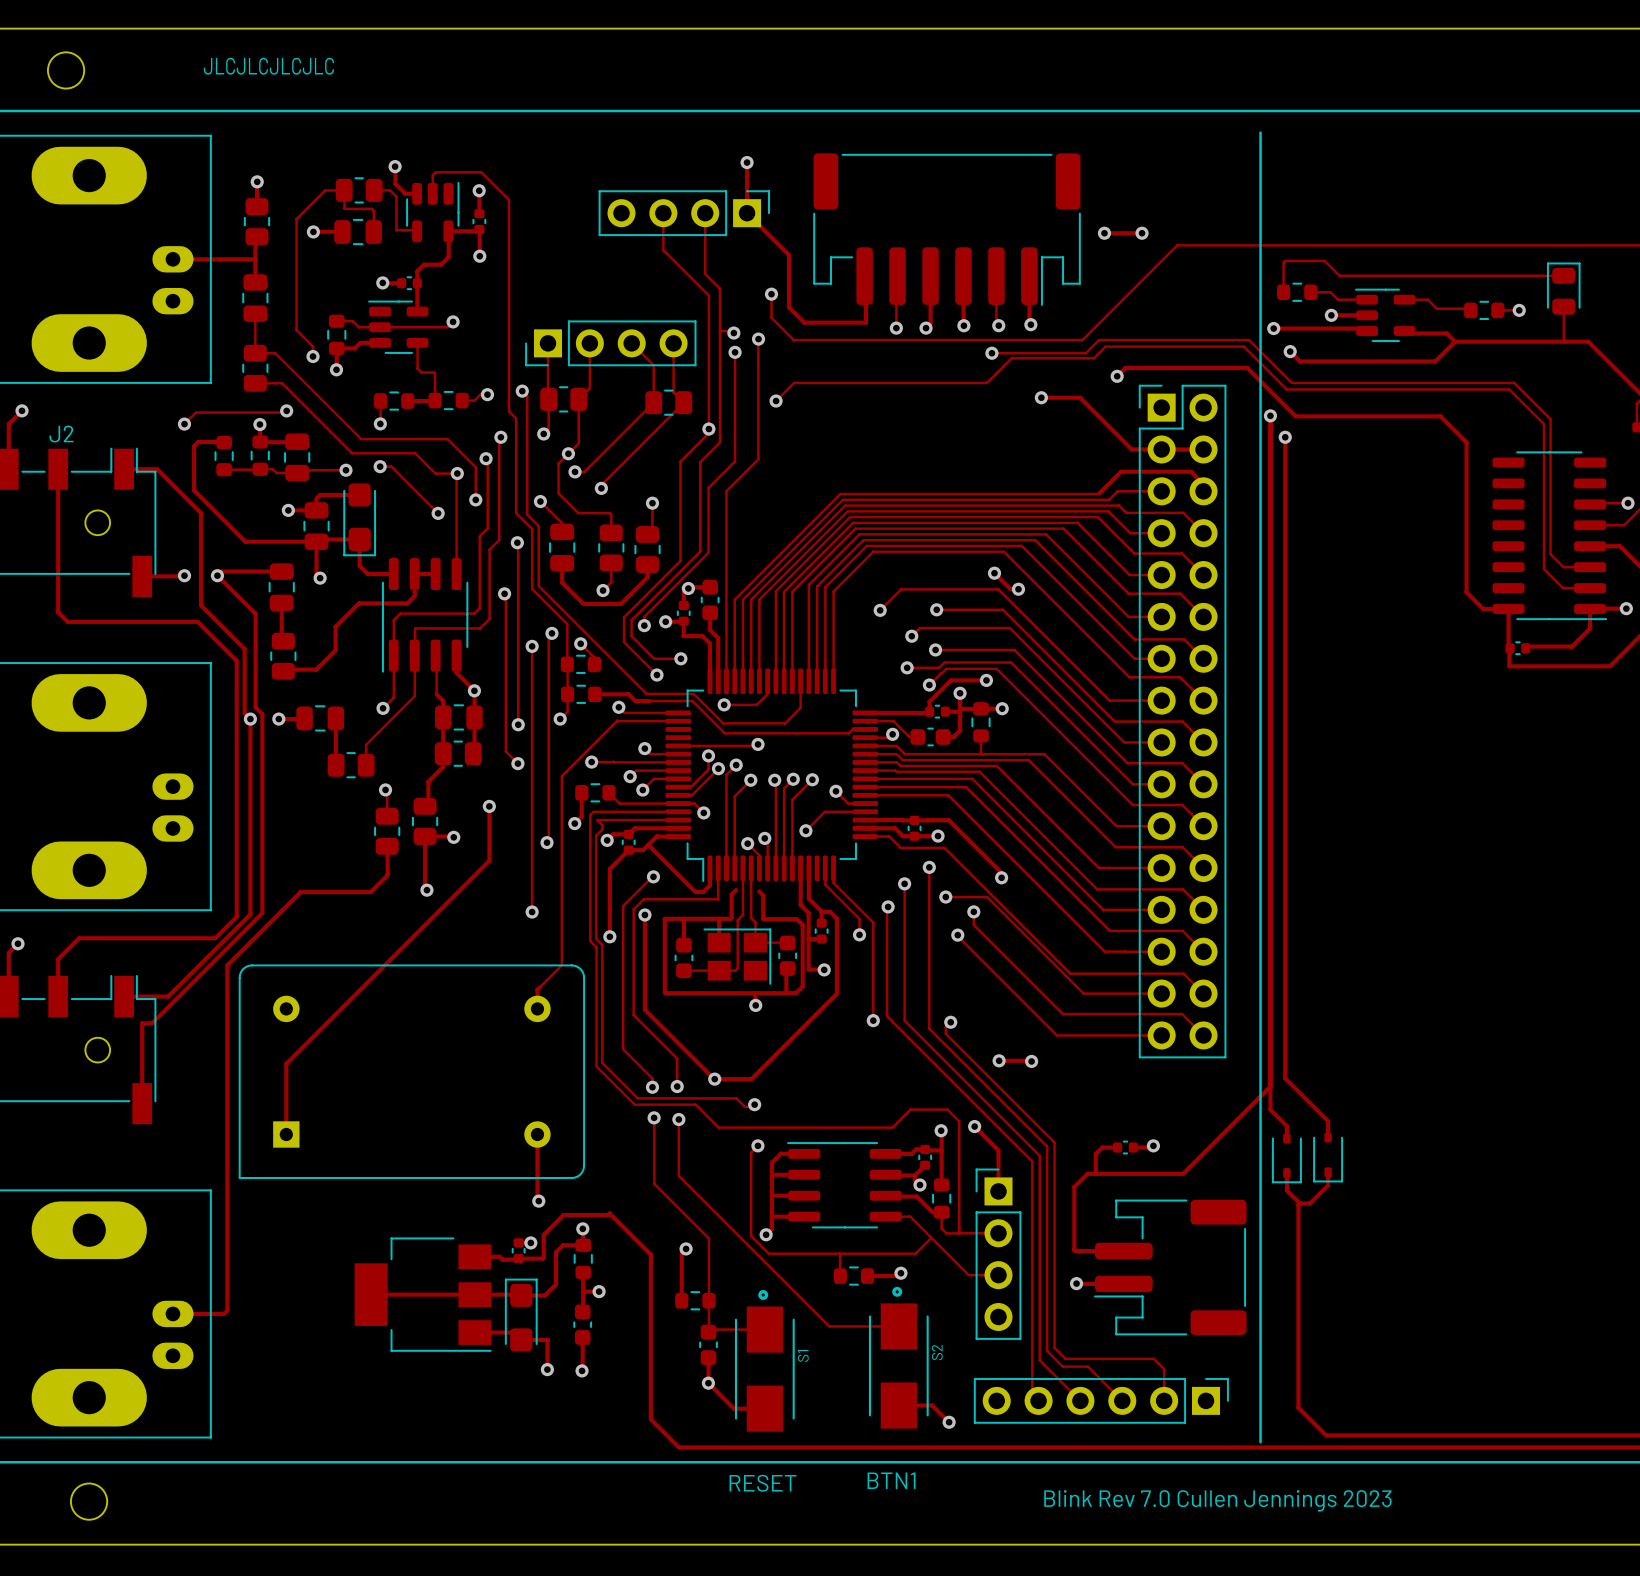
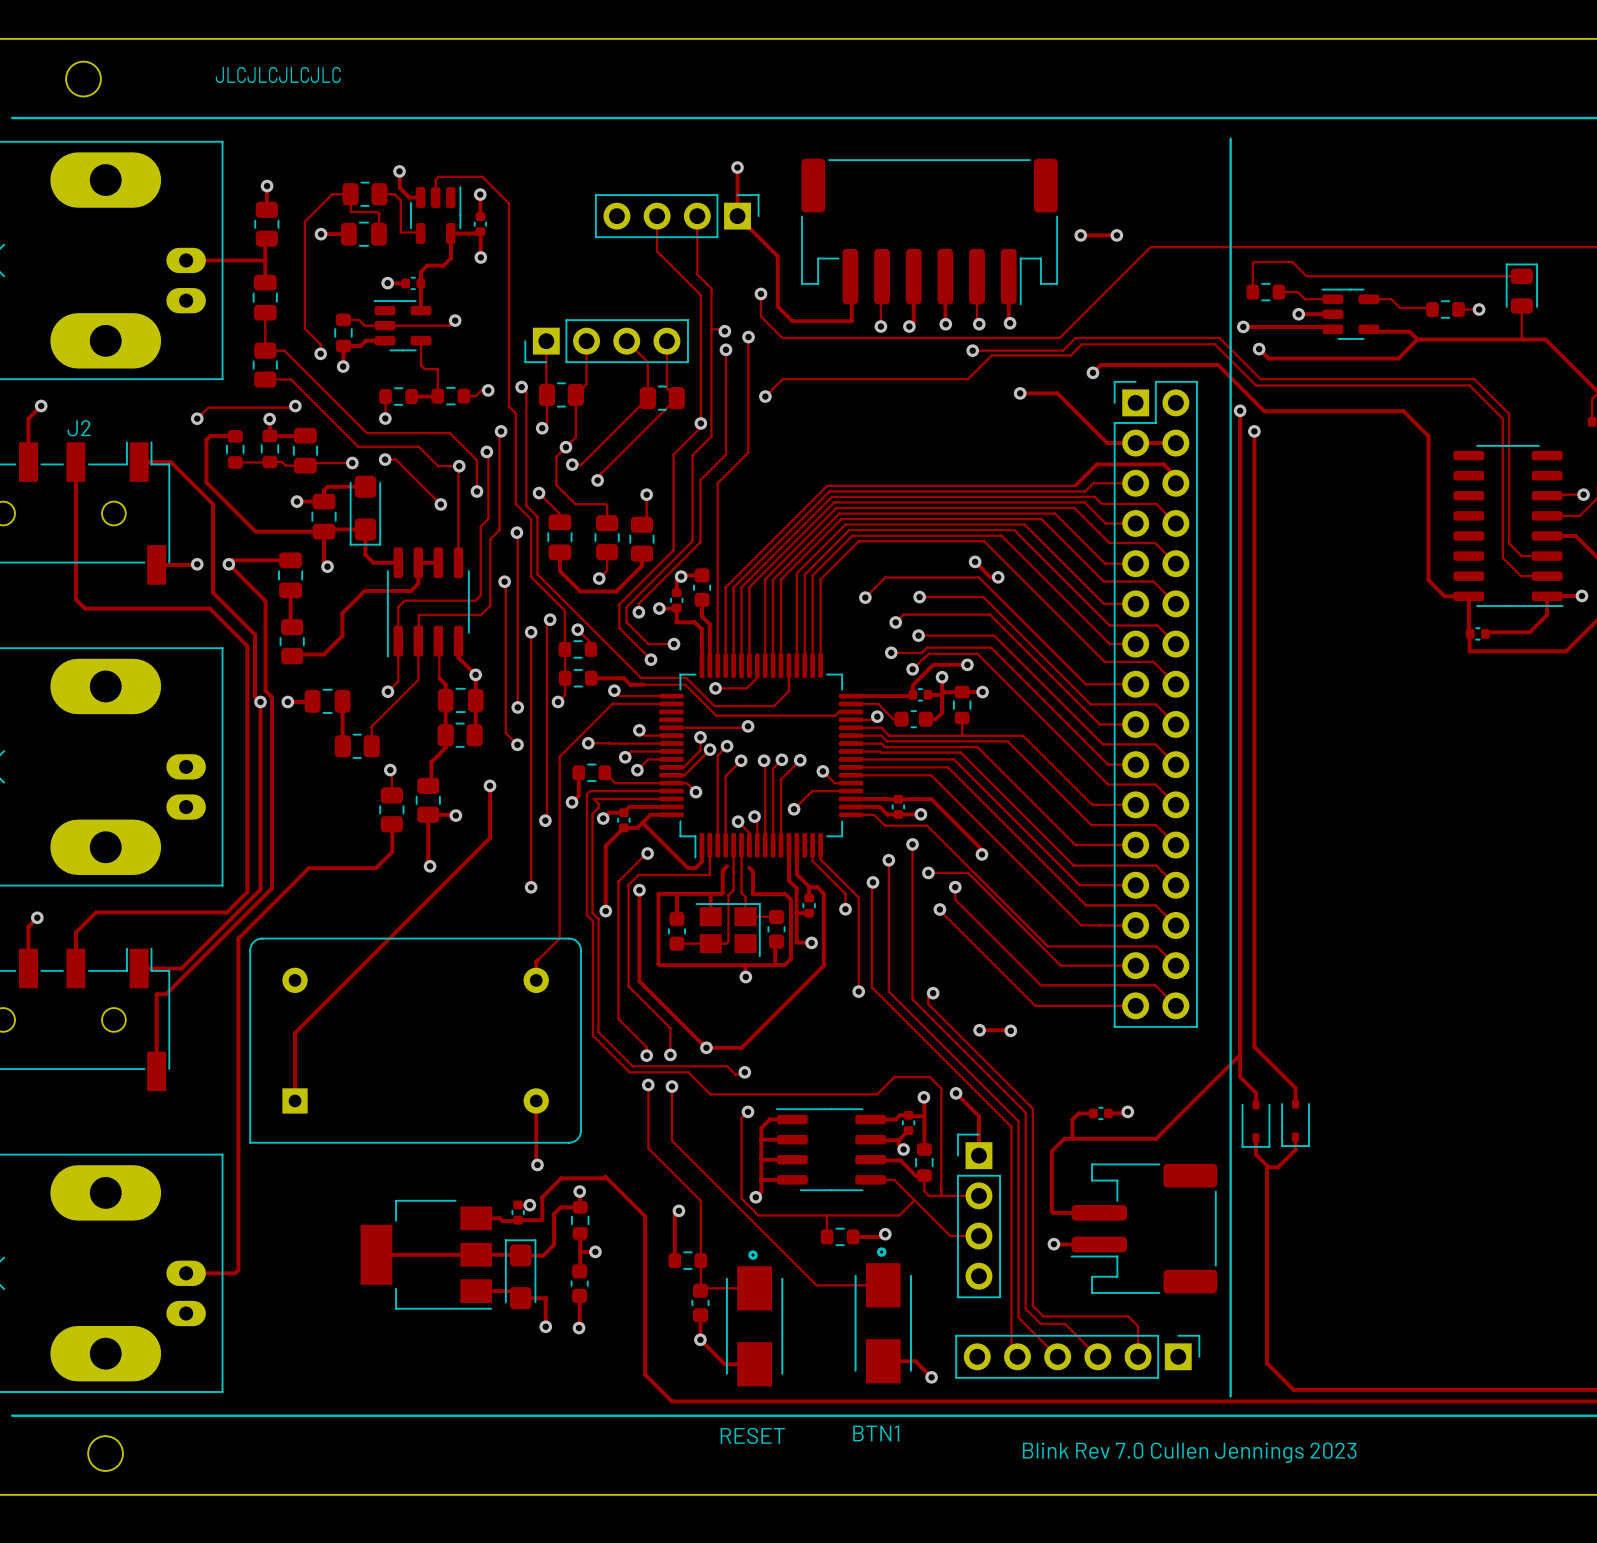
S2 name: S2 (937, 1352) -> none
S1 name: S1 (803, 1355) -> none

